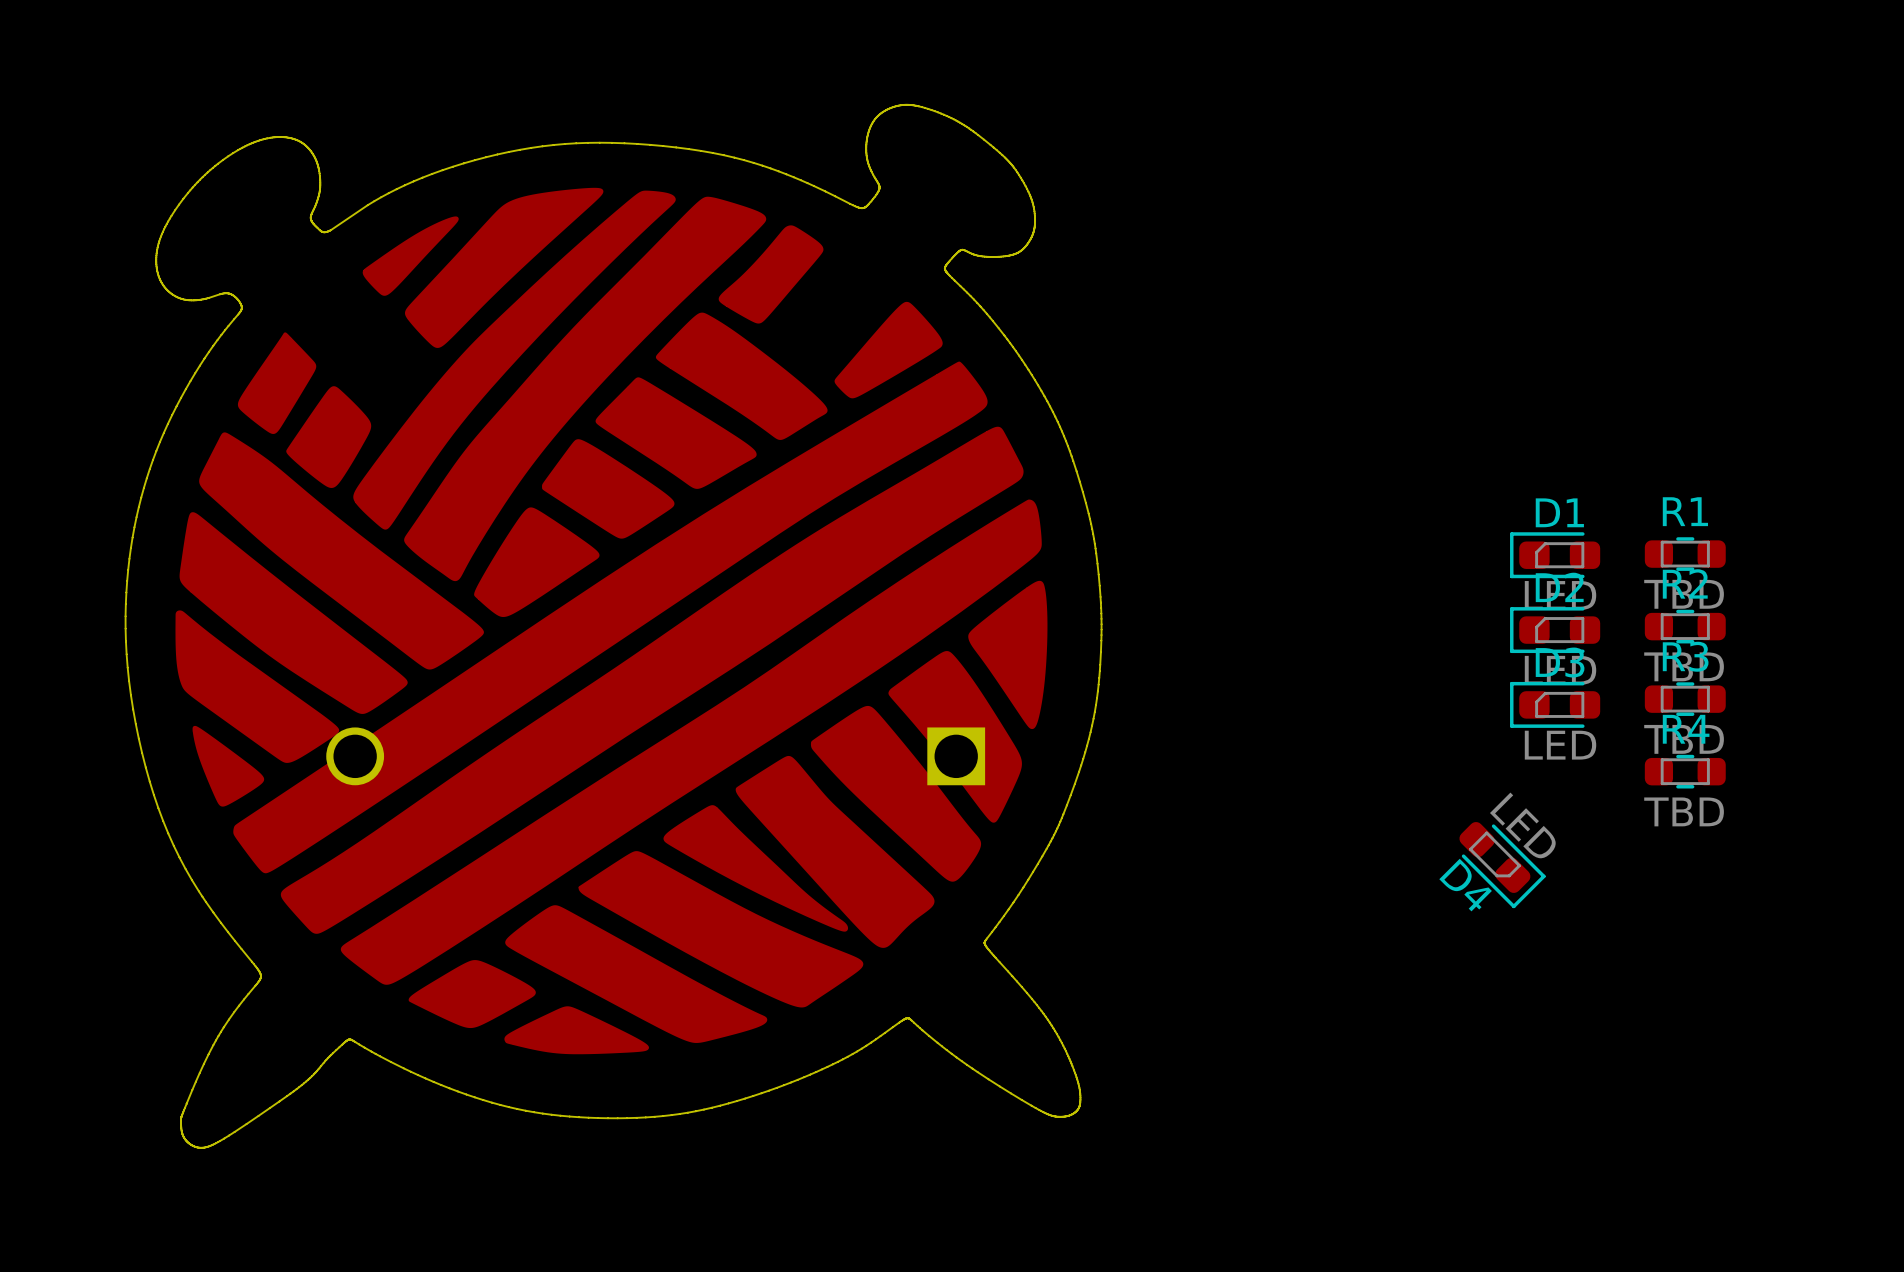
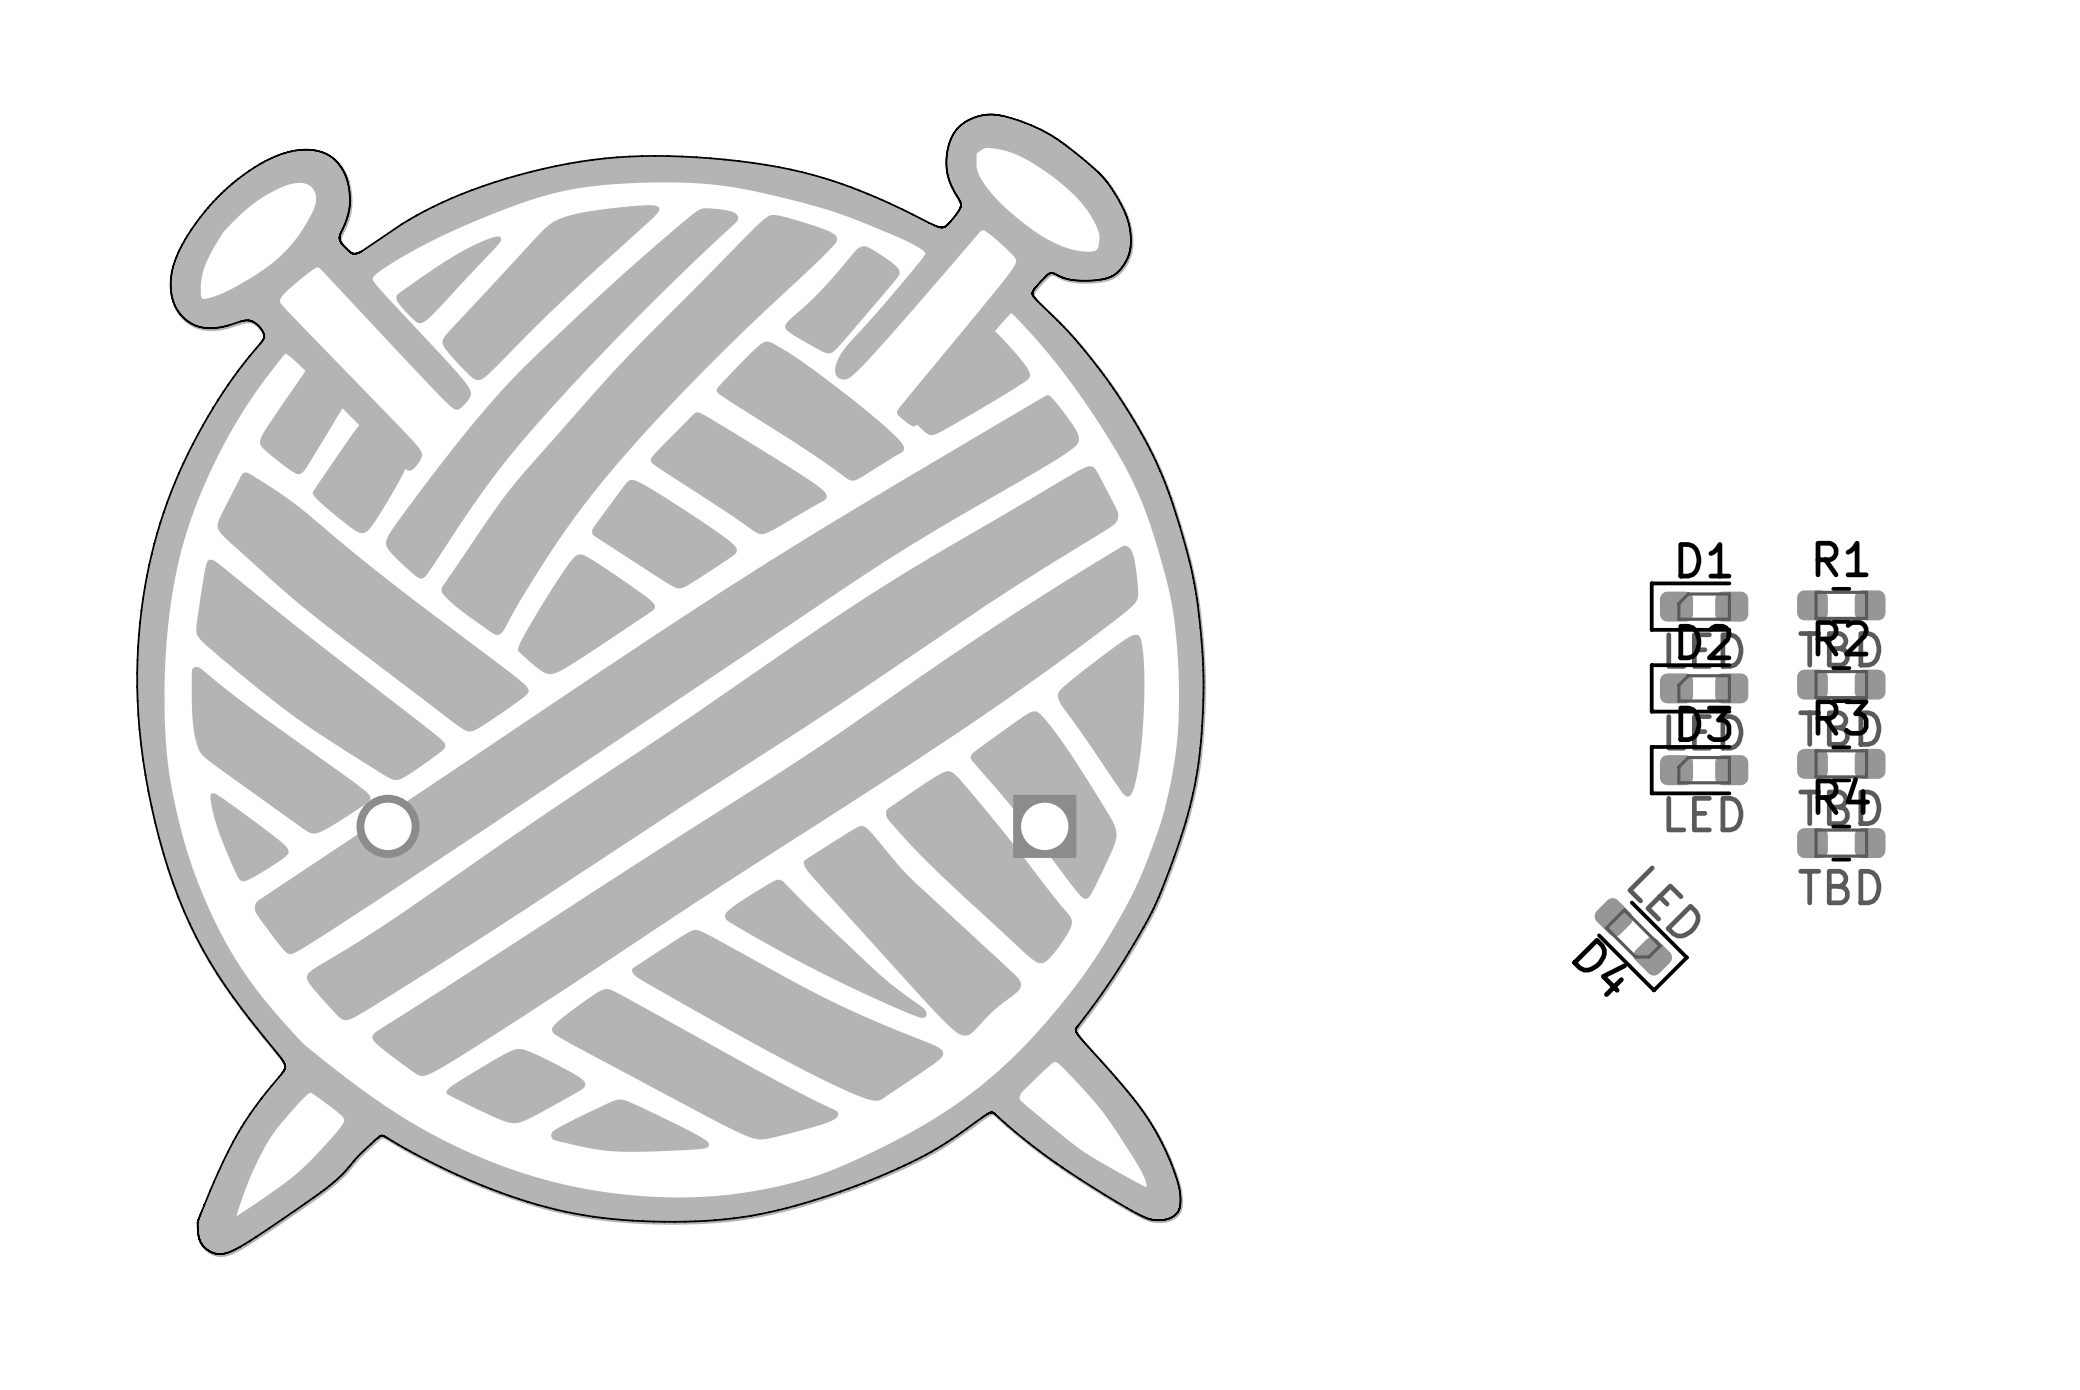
drawing: none -> [136, 114, 1207, 1257]

